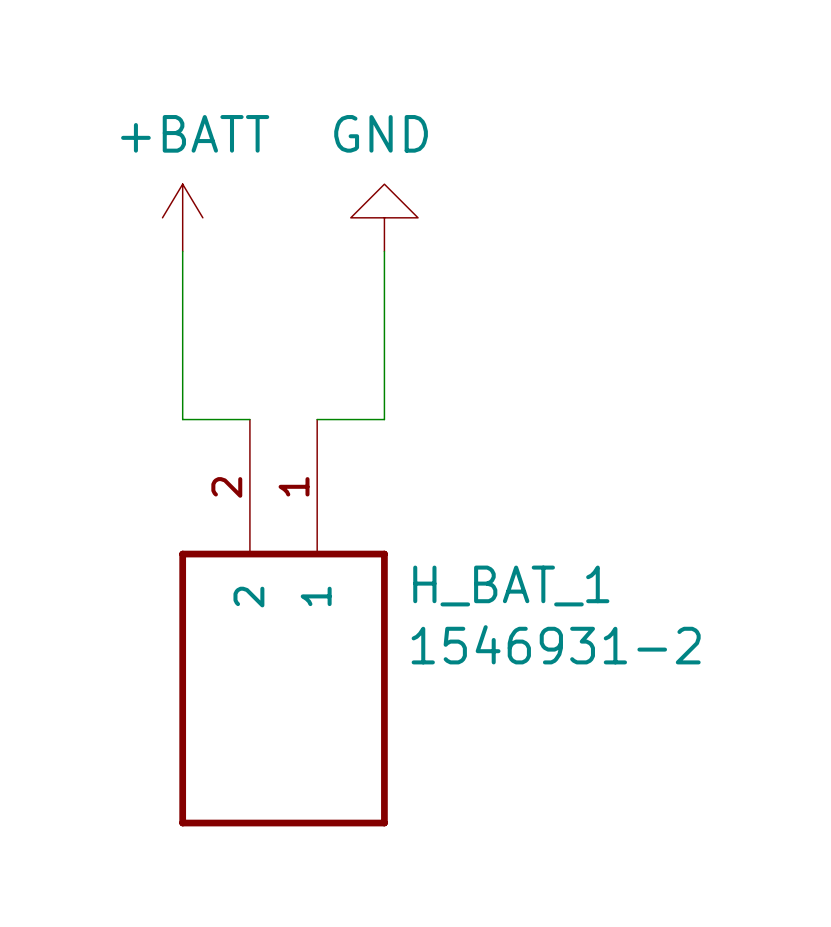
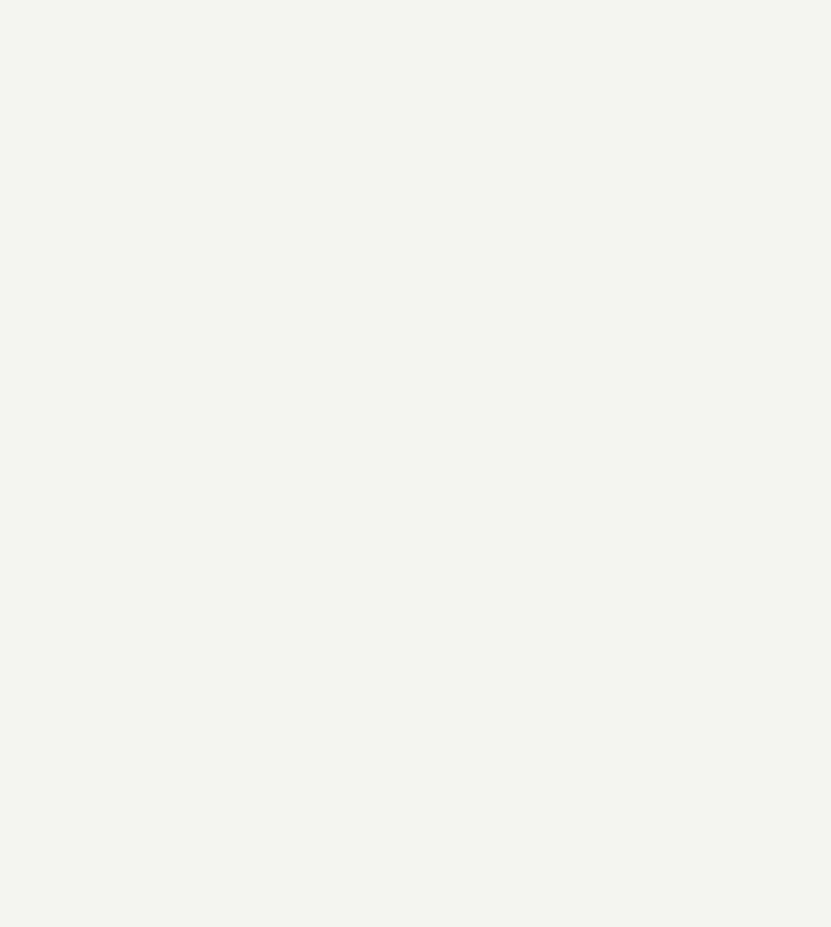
power symbol: +BATT (182, 217) -> none
power symbol: GND (384, 217) -> none
wire: (182, 251) (182, 419) (249, 419) -> none
wire: (384, 251) (384, 419) (317, 419) -> none
H_BAT_1: 1546931-2 (283, 622) -> none

